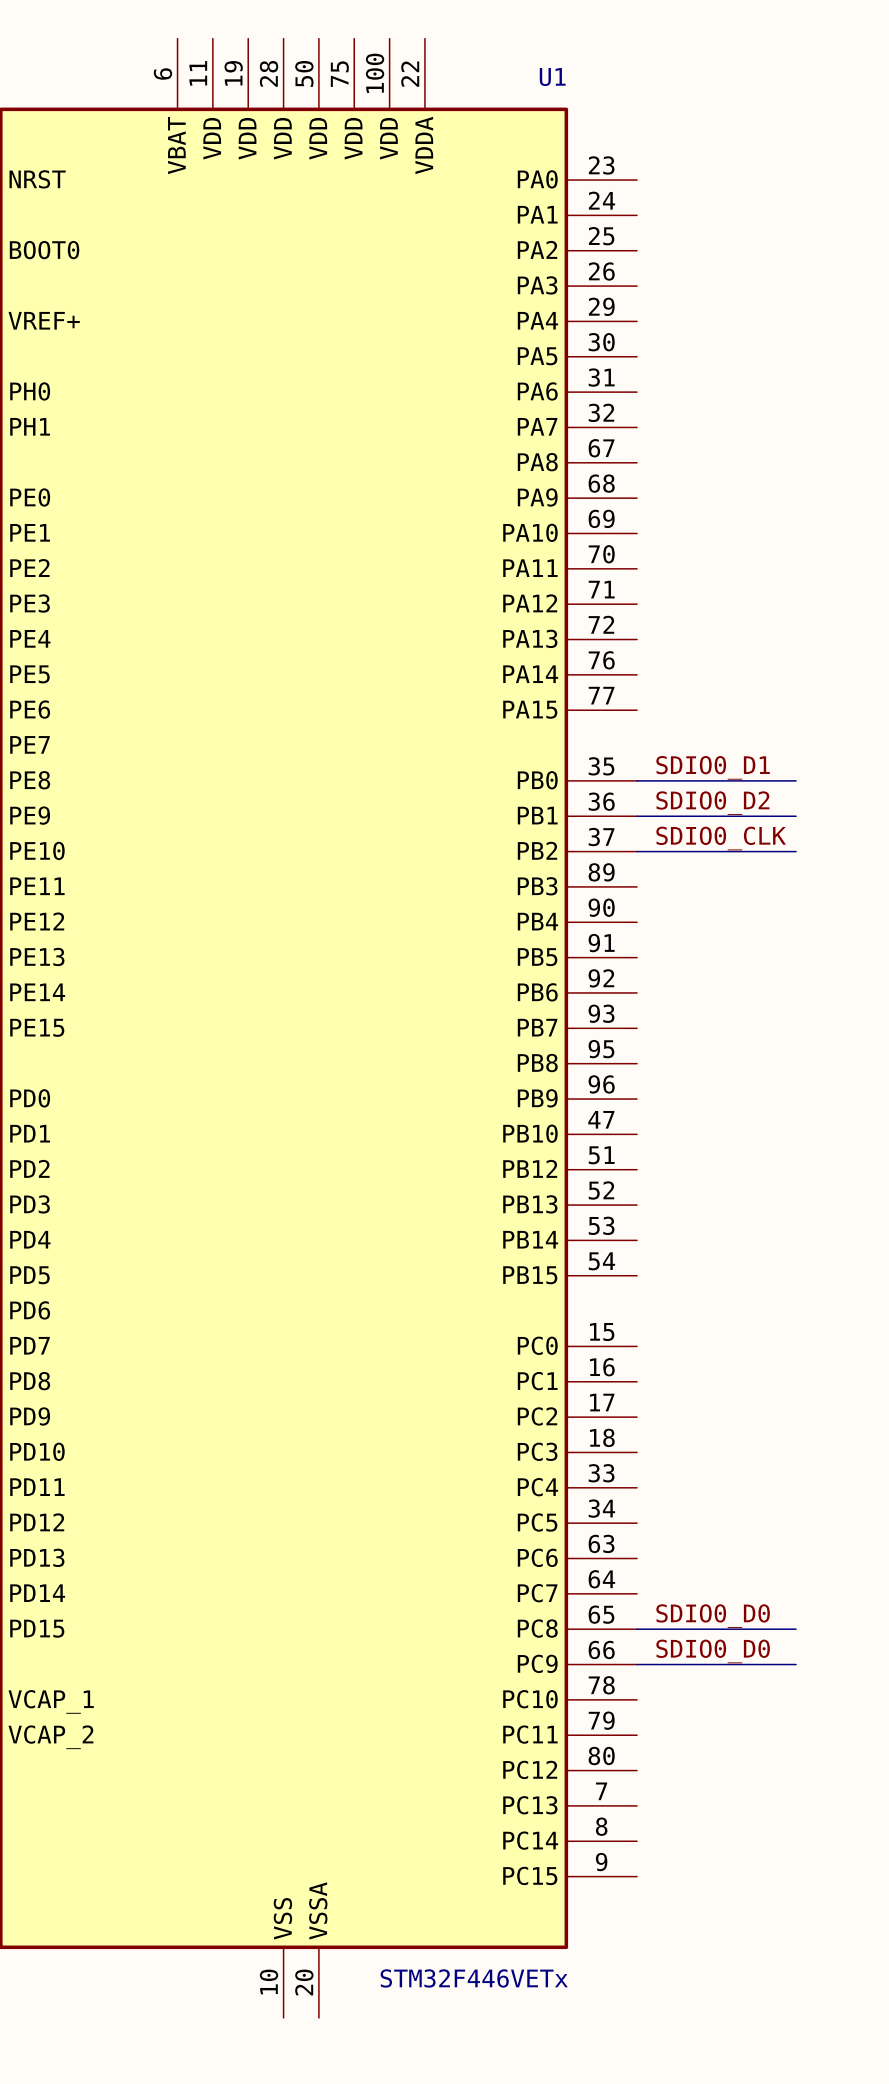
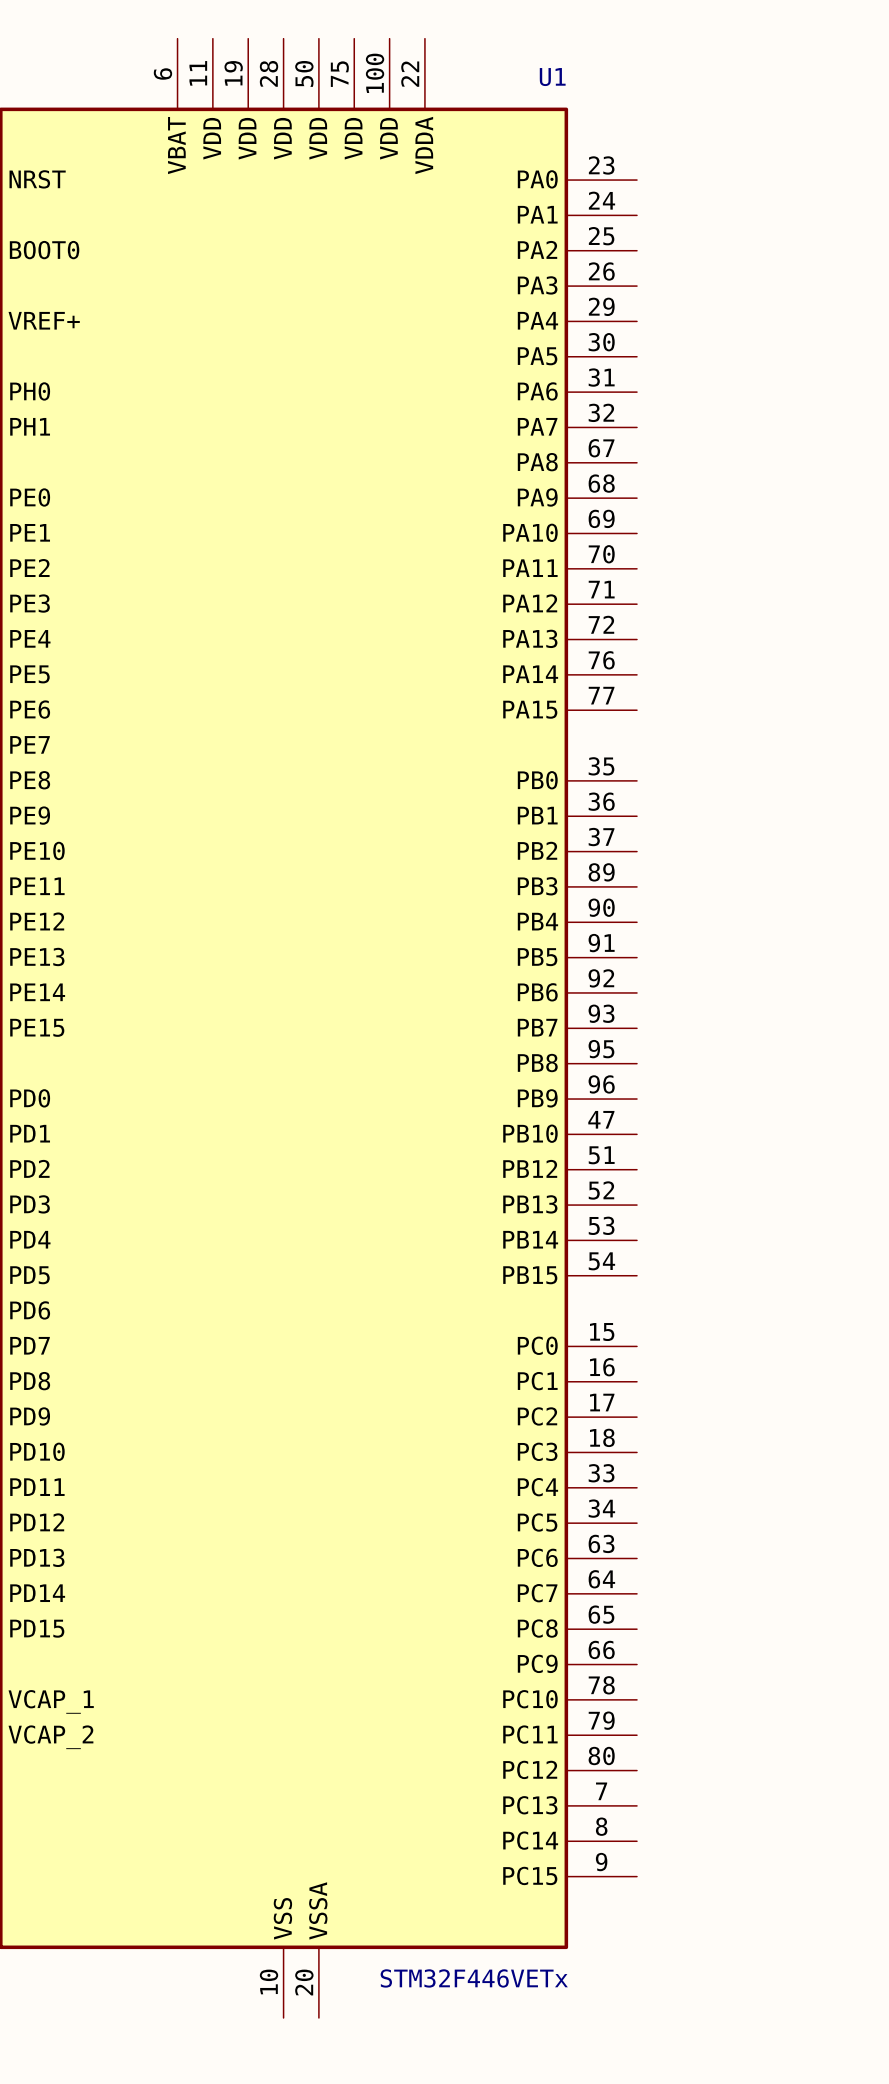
label: SDIO0_D1 (713, 767) -> none
wire: (637, 780) (796, 780) -> none
label: SDIO0_D2 (712, 803) -> none
wire: (637, 816) (796, 816) -> none
label: SDIO0_CLK (721, 838) -> none
wire: (637, 851) (796, 851) -> none
label: SDIO0_D0 (713, 1616) -> none
wire: (637, 1629) (796, 1629) -> none
label: SDIO0_D0 (713, 1651) -> none
wire: (637, 1664) (796, 1664) -> none

